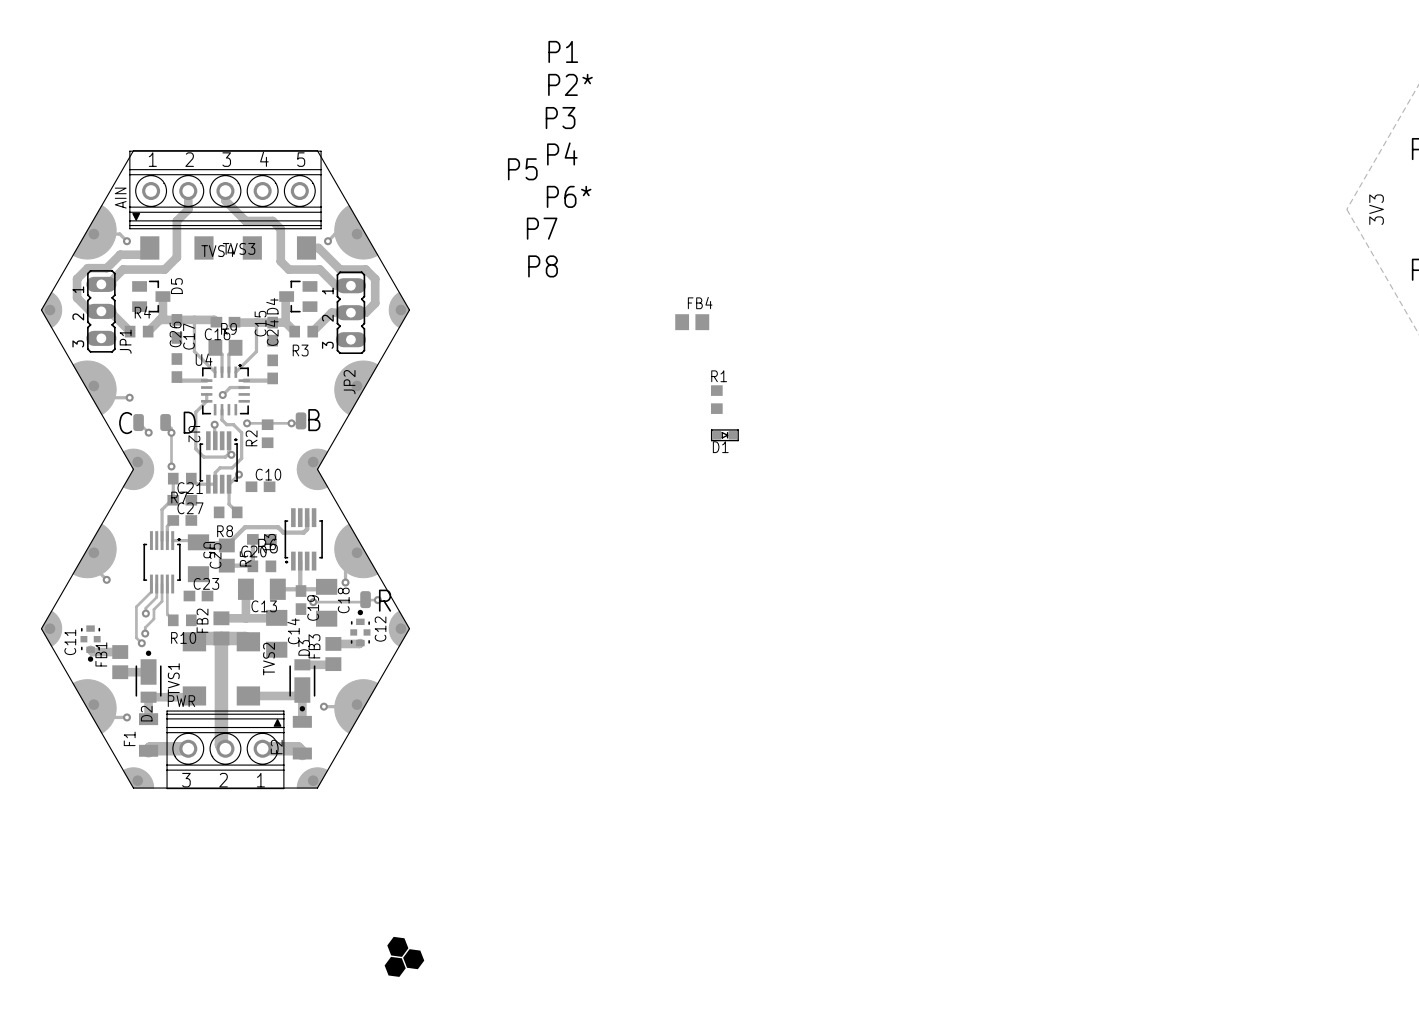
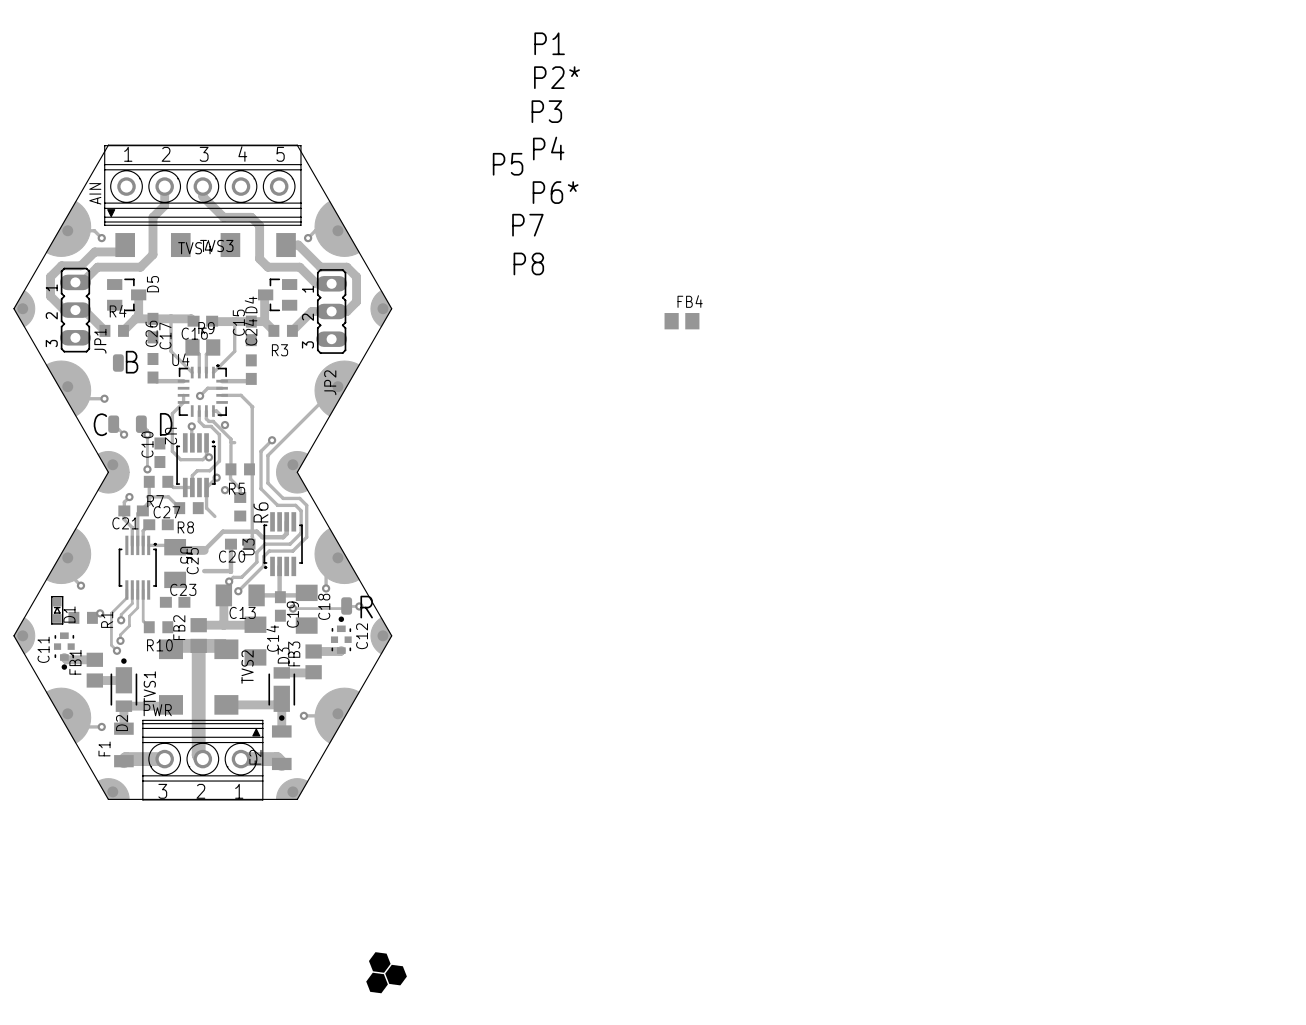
track: none -> (337, 386) (267, 455) (267, 483) (283, 498) (299, 498) (306, 505) (306, 537) (292, 551) (269, 551) (263, 556) (263, 565) (238, 591)
track: none -> (222, 395) (241, 395) (252, 407) (252, 466) (249, 469) (252, 472) (252, 537)
R1 rotation: 0° (716, 399) -> 90° clockwise (83, 617)
R1 position: (716, 399) -> (83, 617)
track: none -> (206, 411) (206, 418) (213, 421) (230, 439) (230, 442) (234, 442)
track: none -> (213, 411) (216, 411) (220, 415)
track: (301, 420) (298, 423) (247, 423) -> none
B position: (301, 420) -> (118, 363)
via position: (291, 423) -> (272, 440)
R2: (267, 433) -> none
D1 rotation: 0° (724, 435) -> 90° counterclockwise (57, 610)
D1 position: (724, 435) -> (57, 610)
track: none -> (272, 440) (261, 451) (261, 488) (277, 505) (295, 505) (301, 510) (301, 533) (290, 544) (265, 544) (256, 552) (256, 562) (241, 577) (233, 577) (229, 581)
track: none -> (230, 444) (230, 479) (240, 488) (240, 497)
C10 name position: C10 (268, 474) -> C10 (147, 444)
via: none -> (225, 490)
C10 rotation: 0° (260, 486) -> 90° clockwise (159, 452)
C10 position: (260, 486) -> (159, 452)
C21 name position: C21 (190, 488) -> C21 (125, 523)
track: none -> (129, 497) (124, 502) (123, 519) (132, 527) (132, 545)
via: none -> (129, 497)
track: none -> (147, 496) (168, 496) (179, 508)
C21 position: (182, 500) -> (133, 510)
R8 position: (228, 512) -> (188, 508)
R5 footprint: [218, 538, 235, 573] -> [225, 463, 255, 476]
R5 name position: R5 (245, 558) -> R5 (237, 488)
R6 rotation: 0° (261, 566) -> 90° clockwise (240, 506)
R6 position: (261, 566) -> (240, 506)
via: none -> (229, 581)
via: none -> (238, 591)
via: none -> (100, 613)

